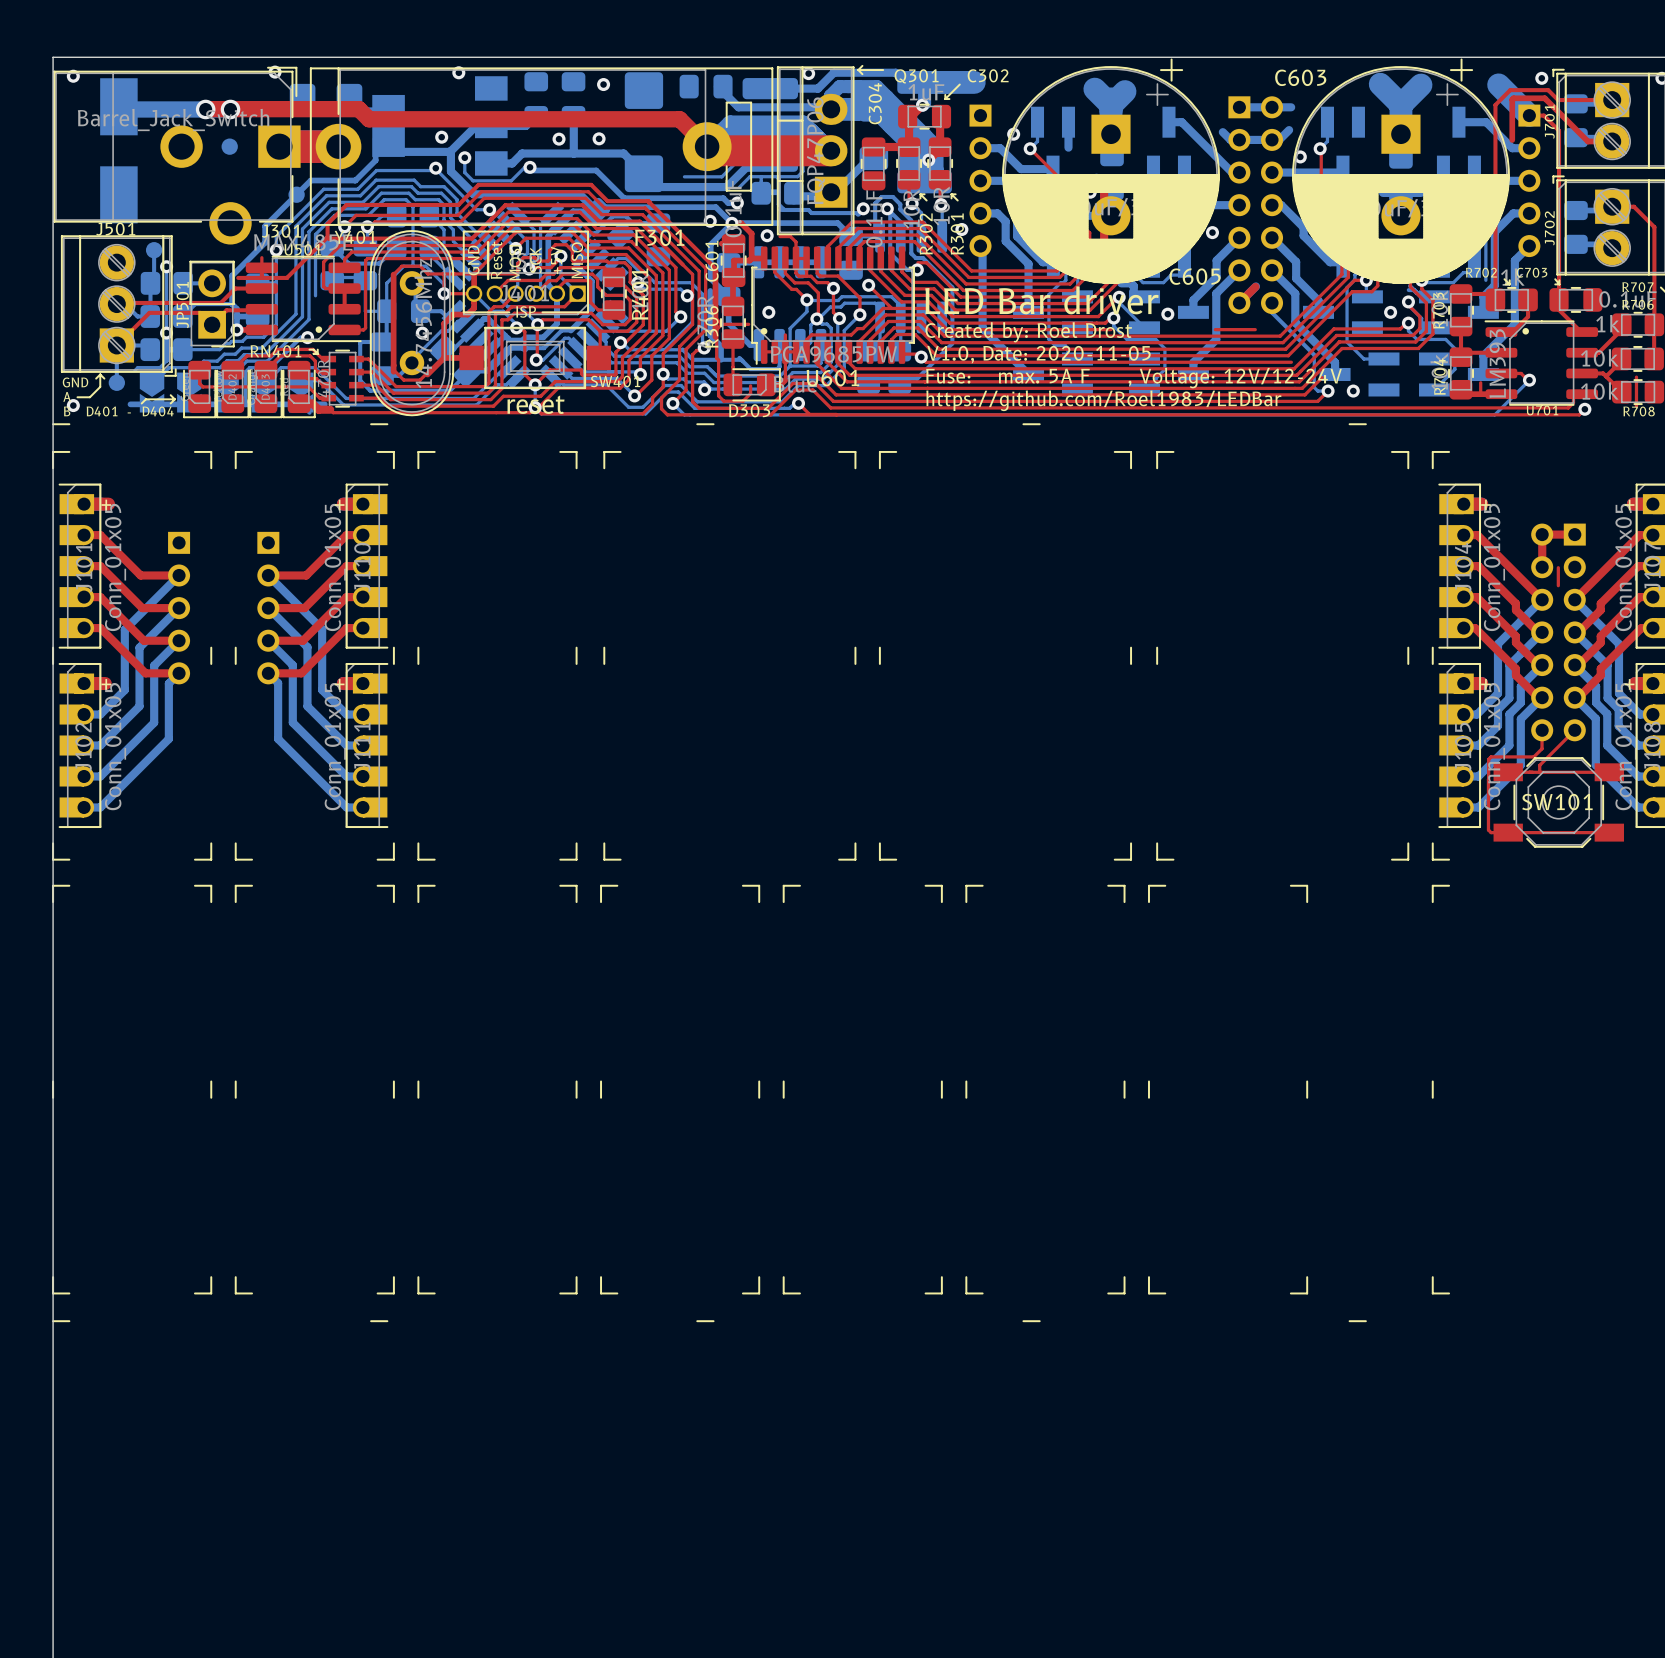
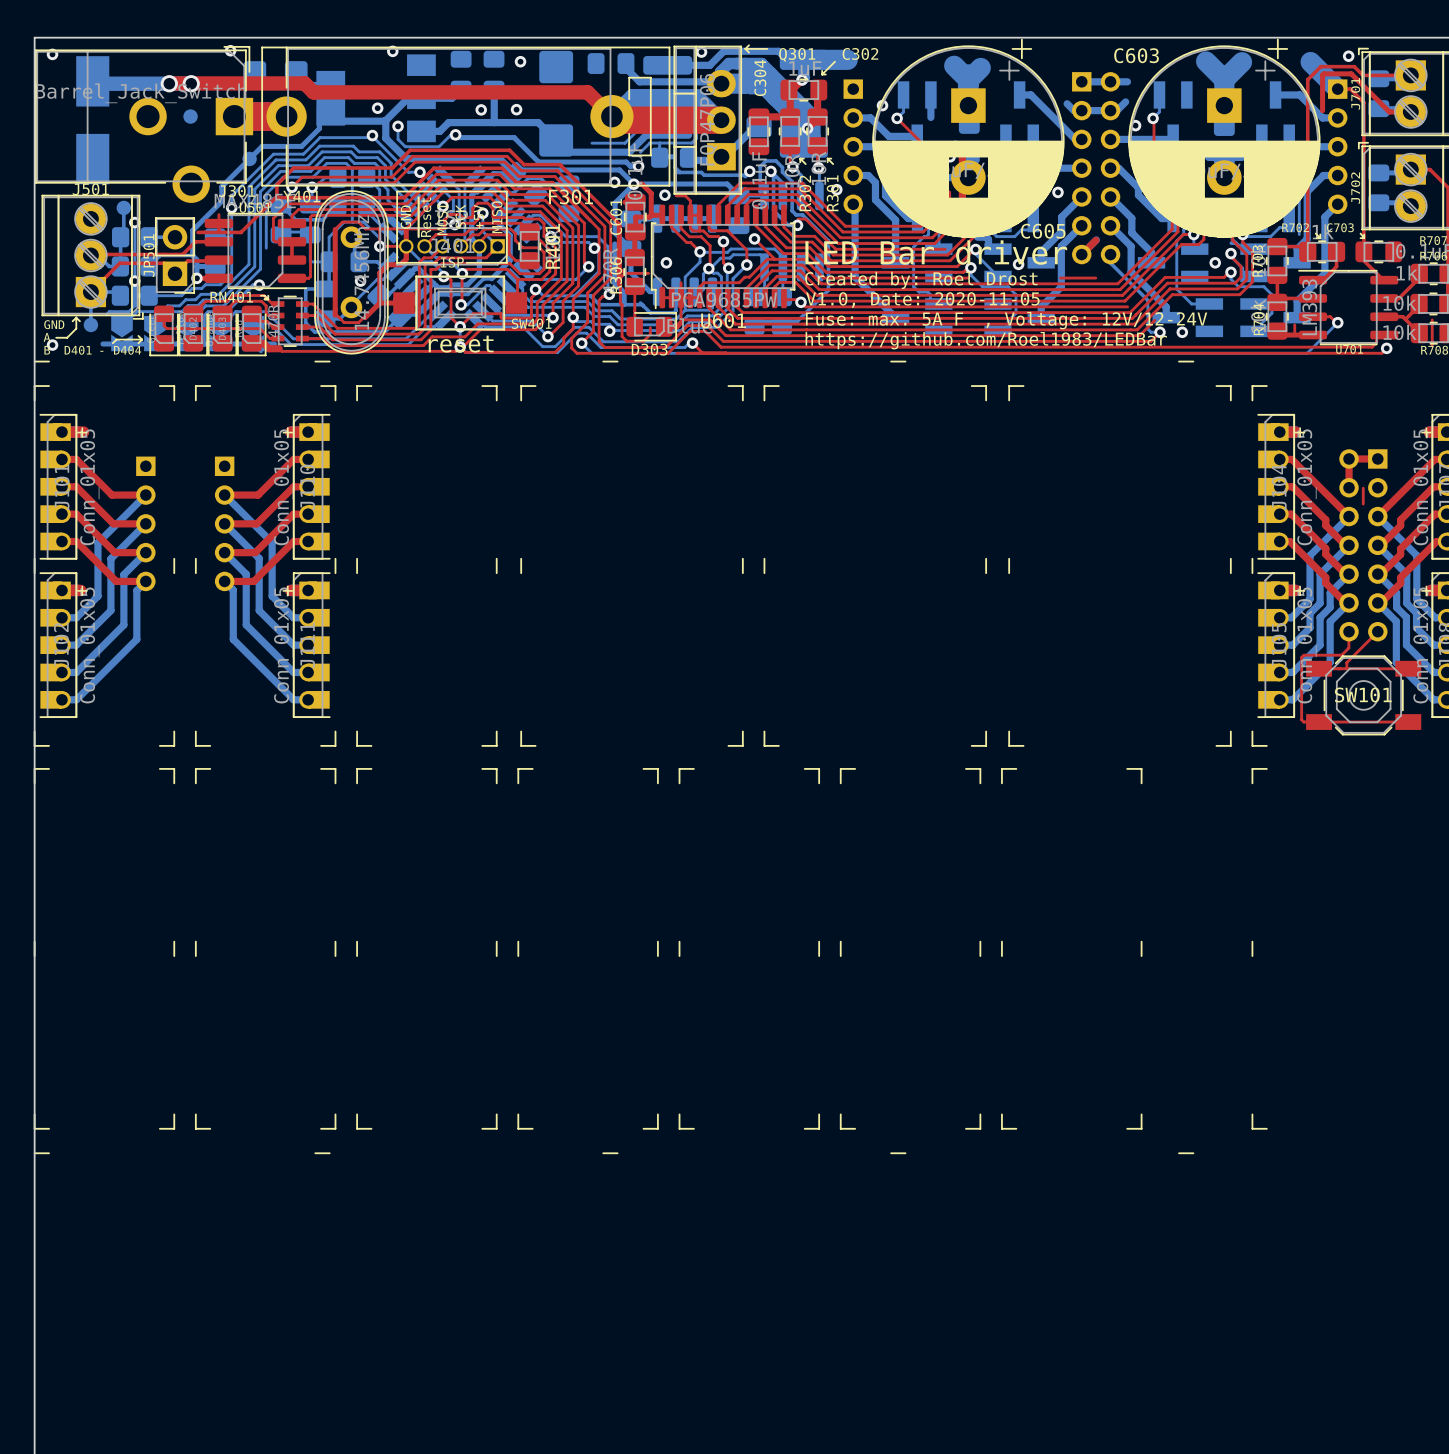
drawing: [315, 326, 323, 333] -> none
drawing: [760, 328, 768, 335] -> none
drawing: [1522, 328, 1529, 335] -> none

